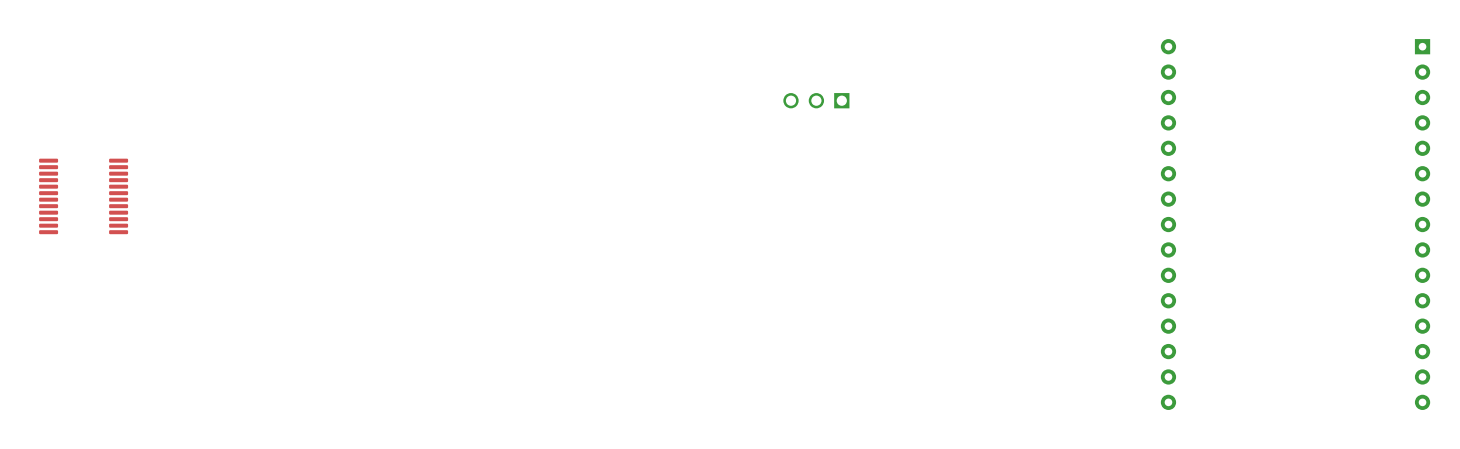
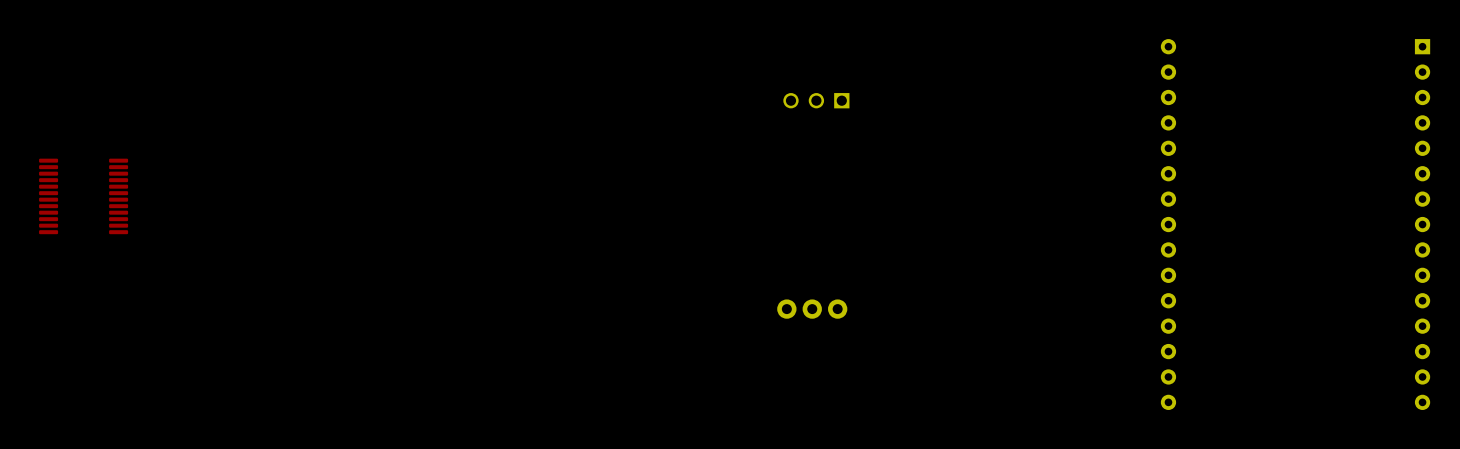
part: none -> (812, 309)

